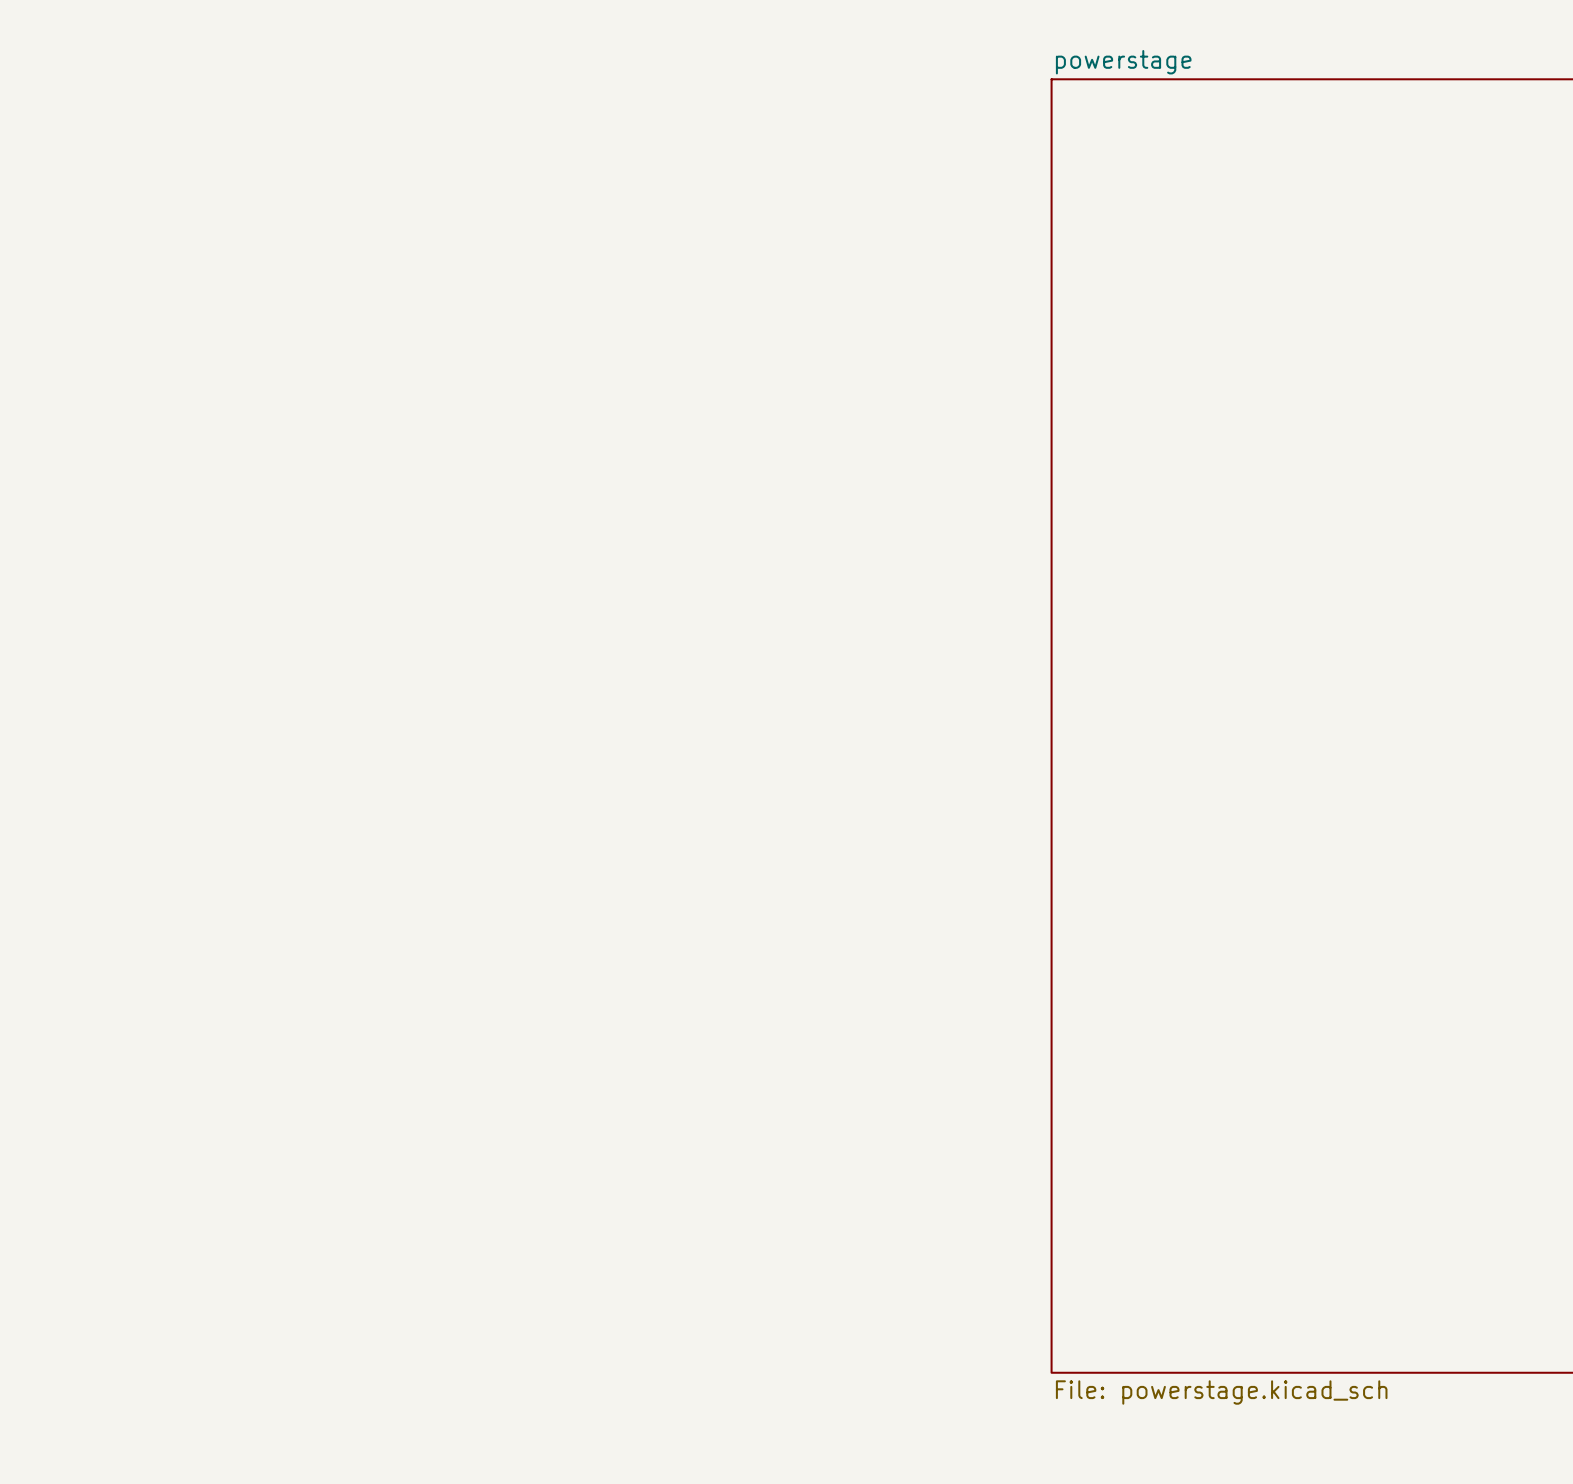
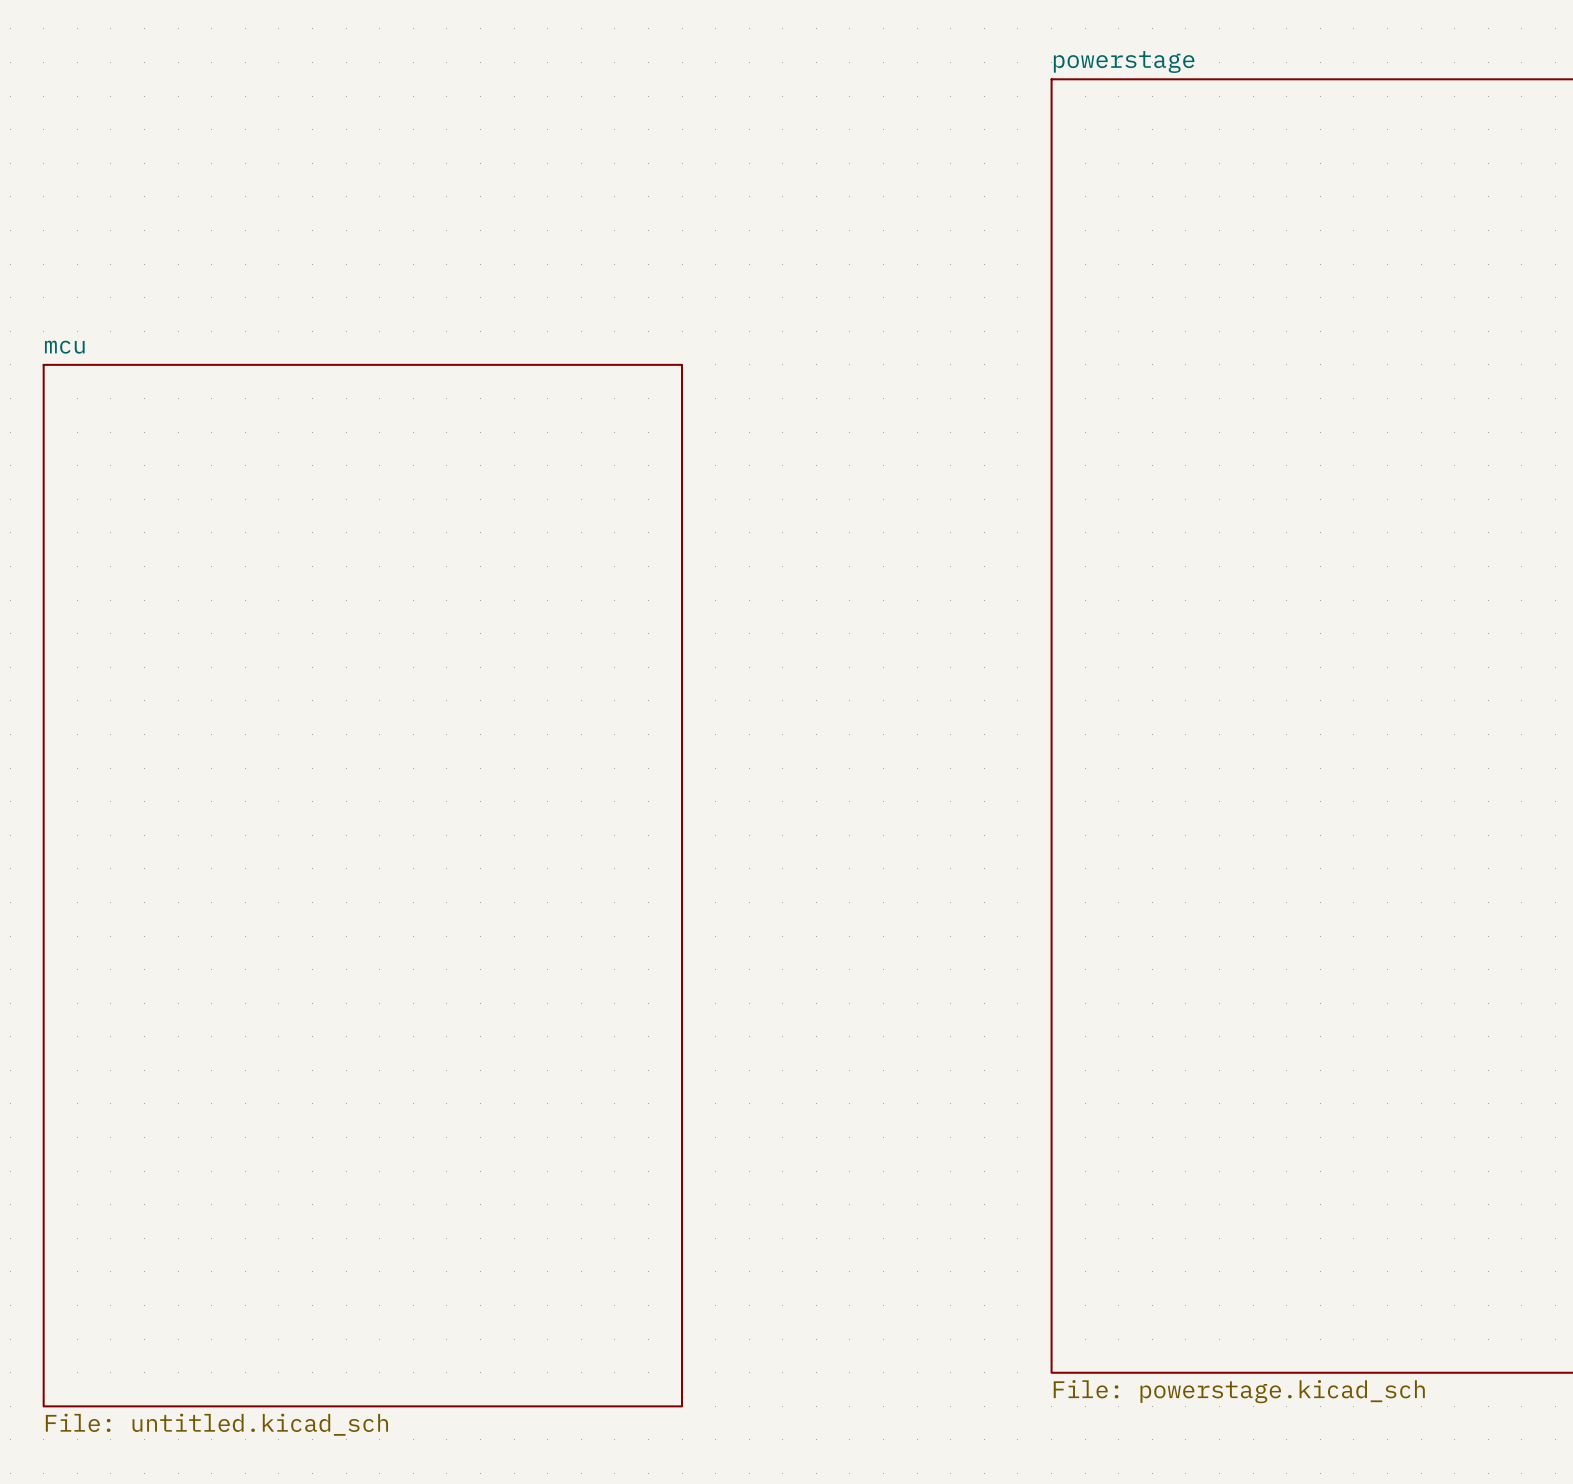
sheet mcu: none -> File: untitled.kicad_sch (362, 885)

